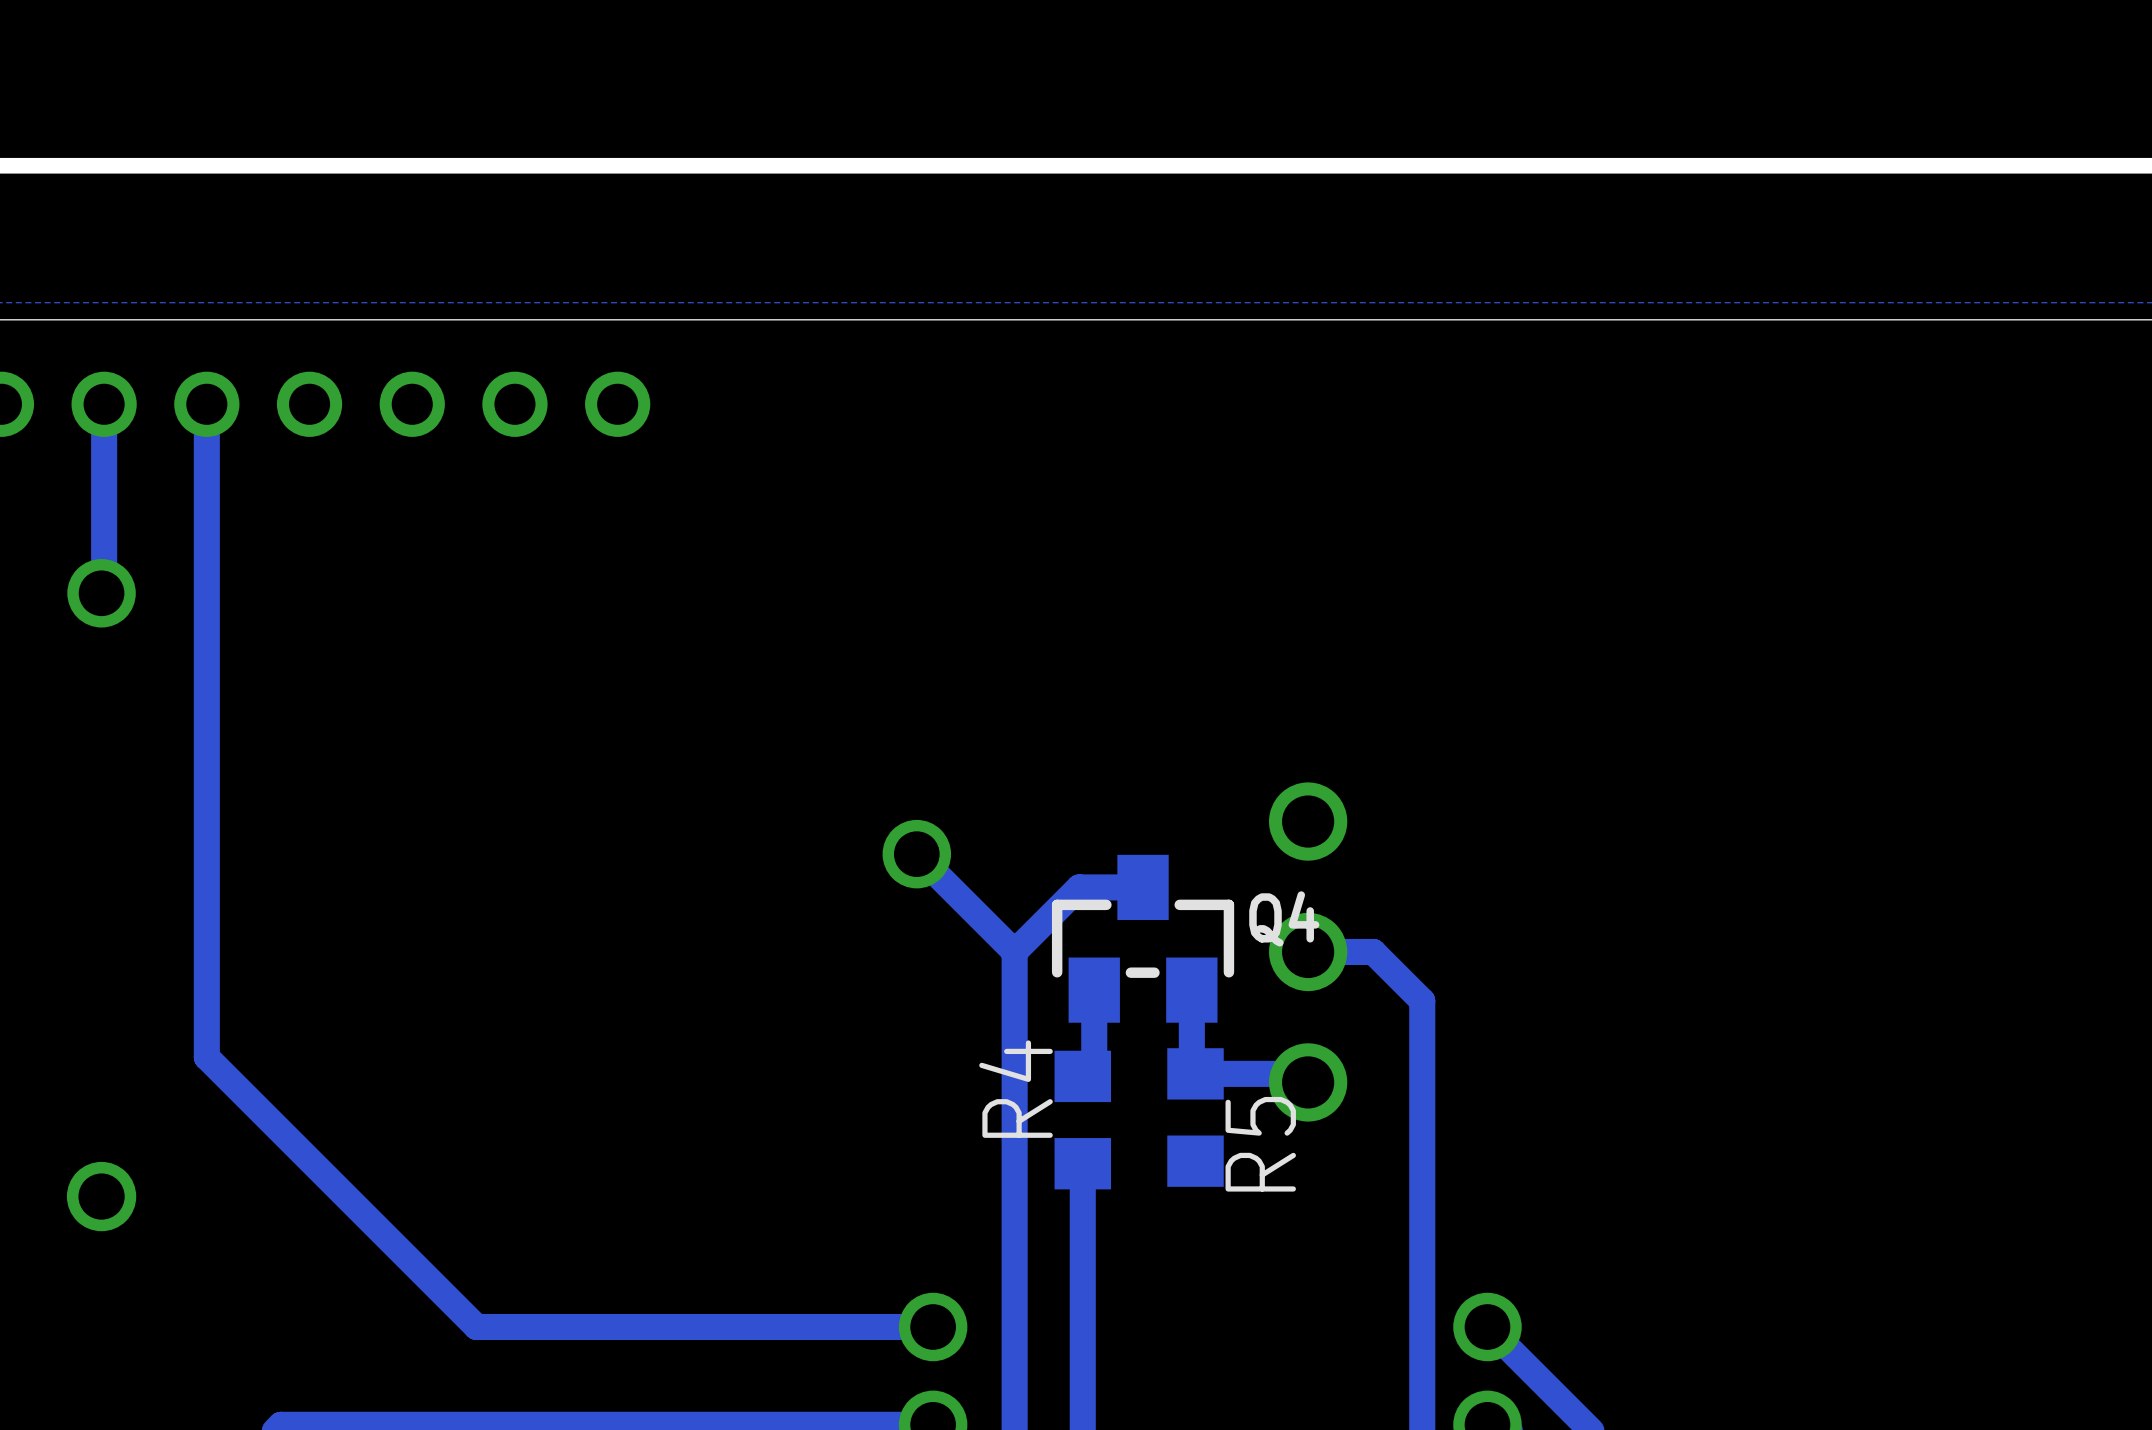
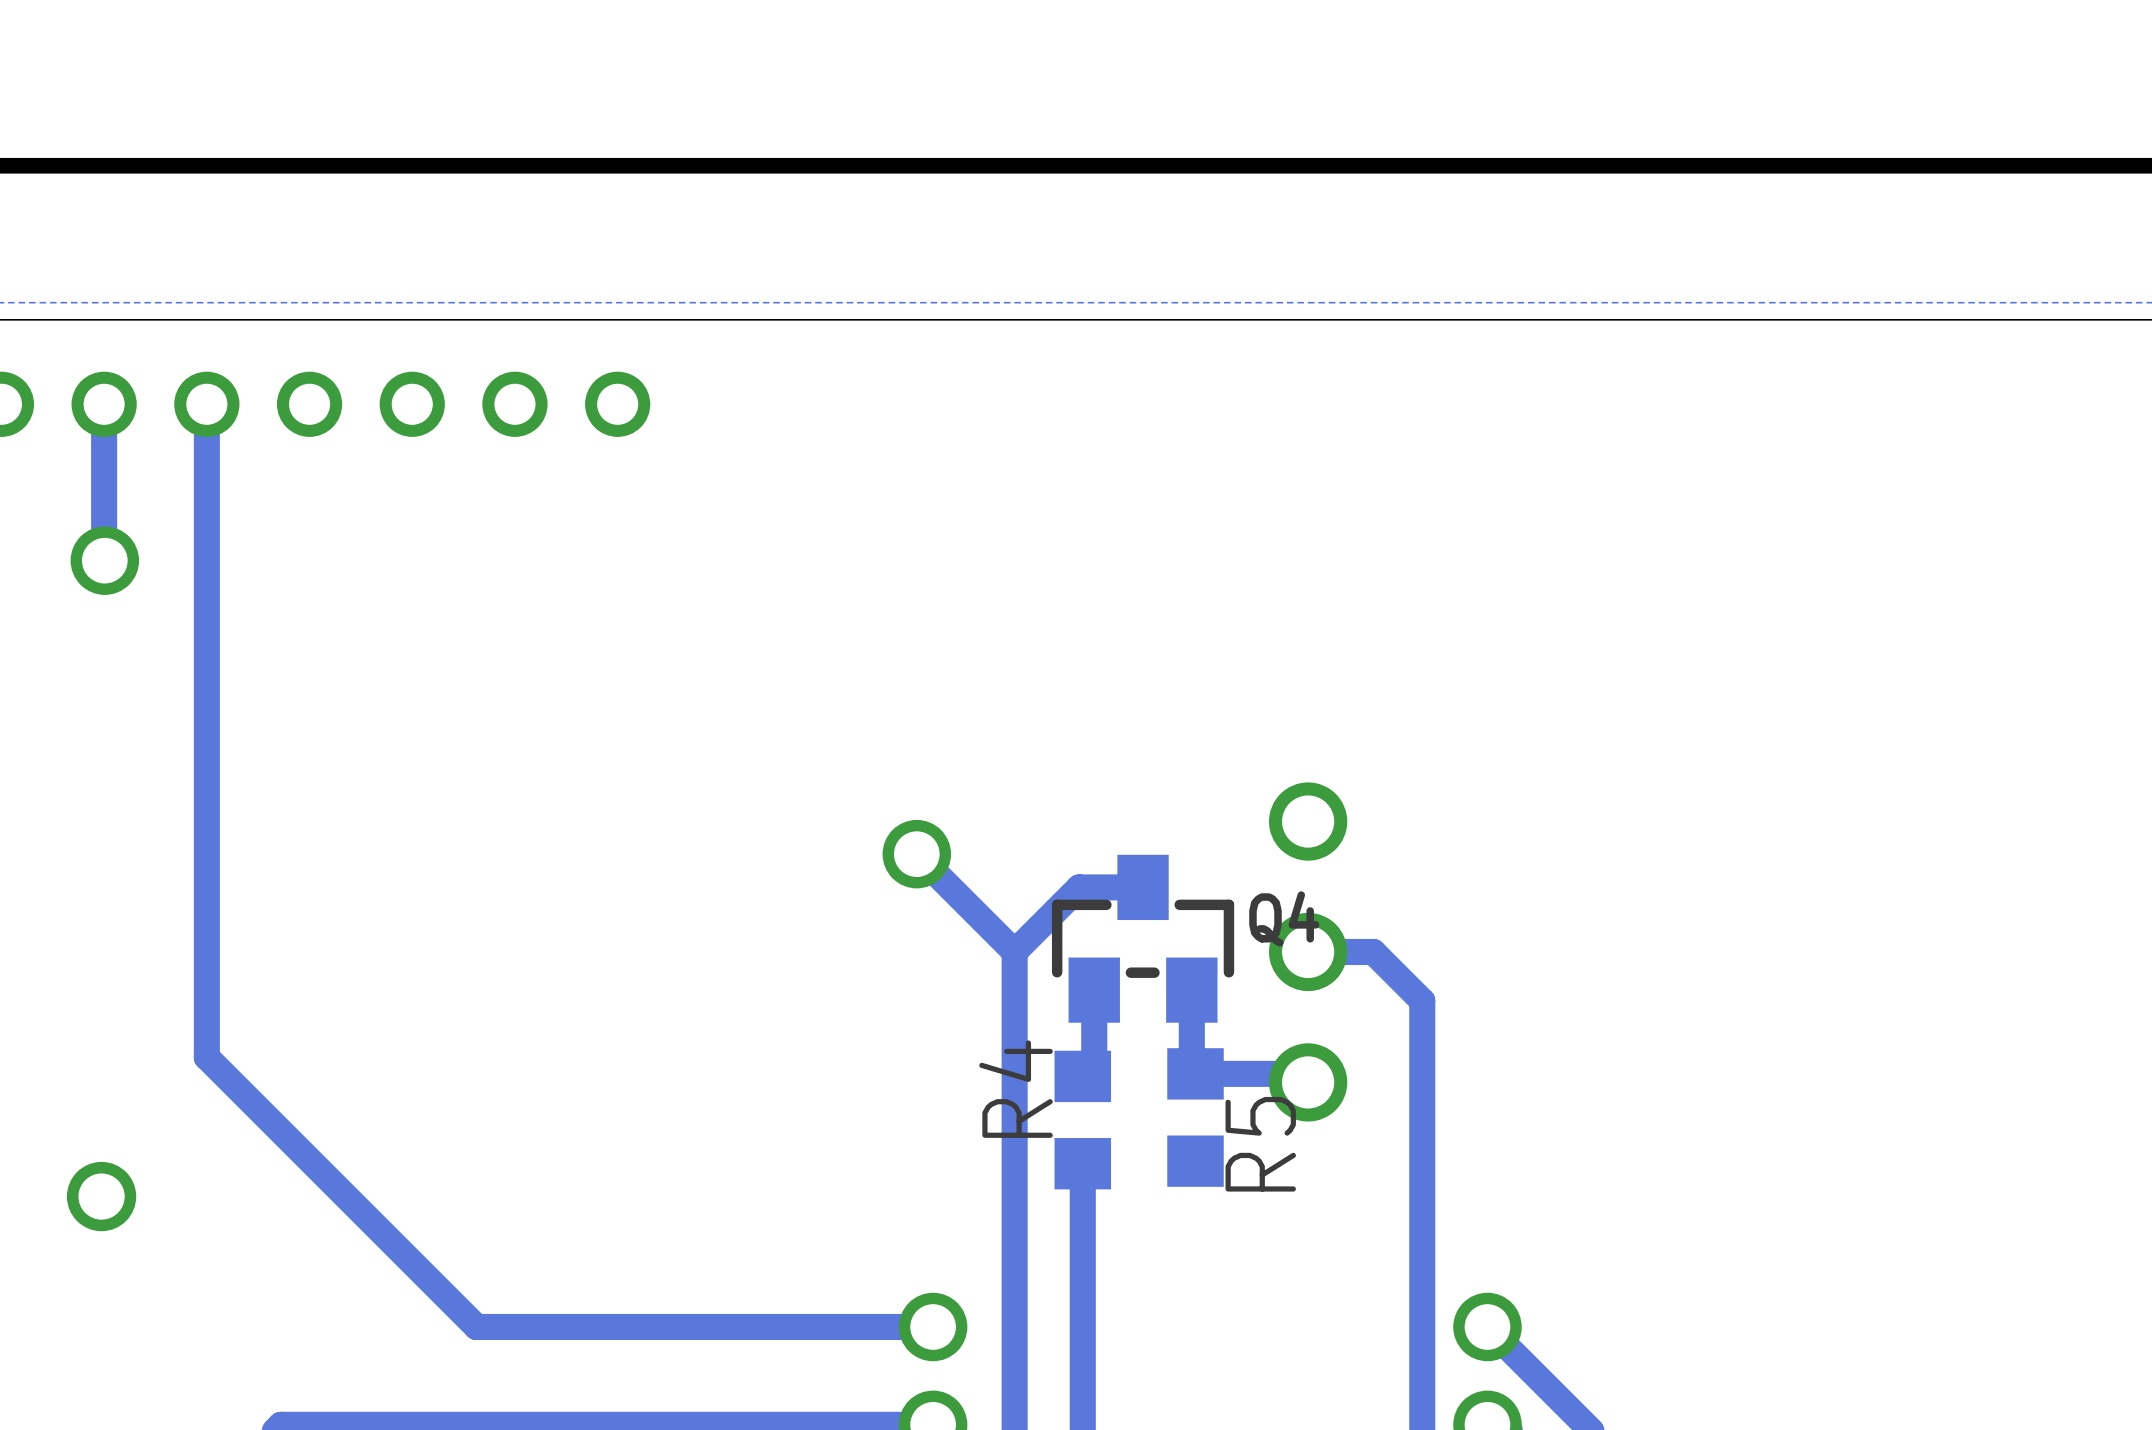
via position: (101, 593) -> (104, 560)

